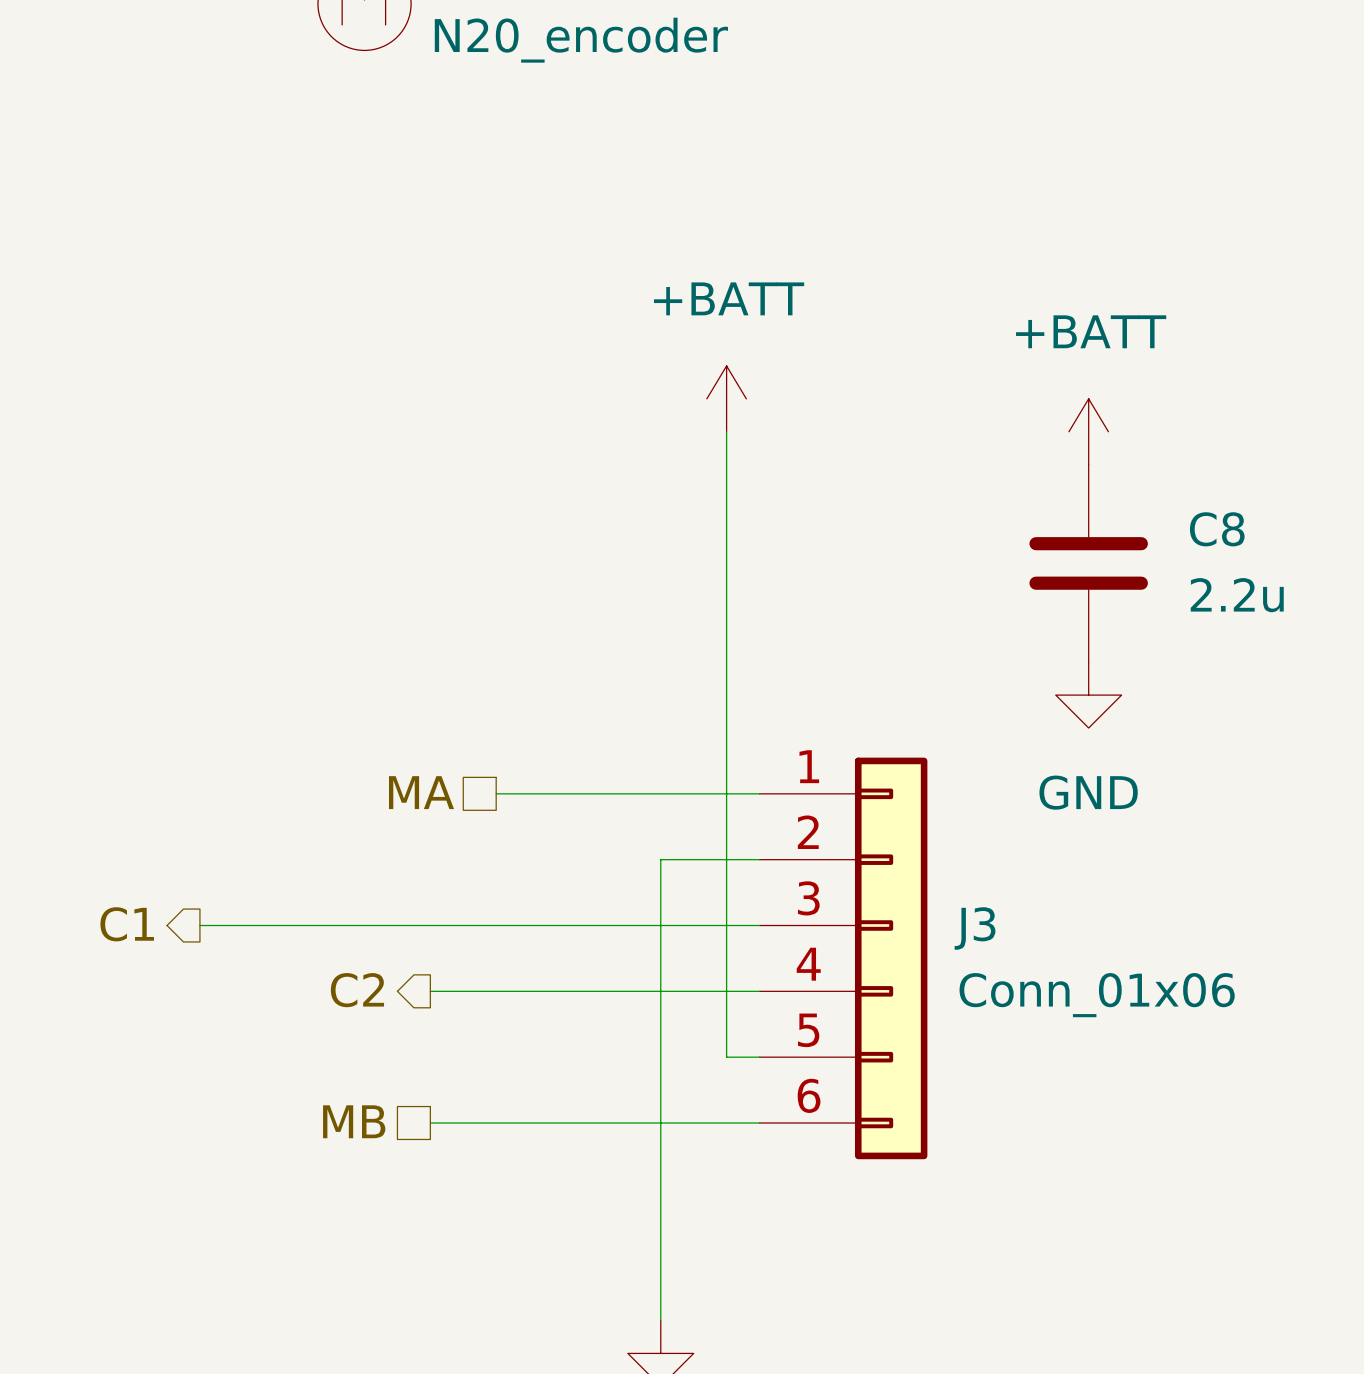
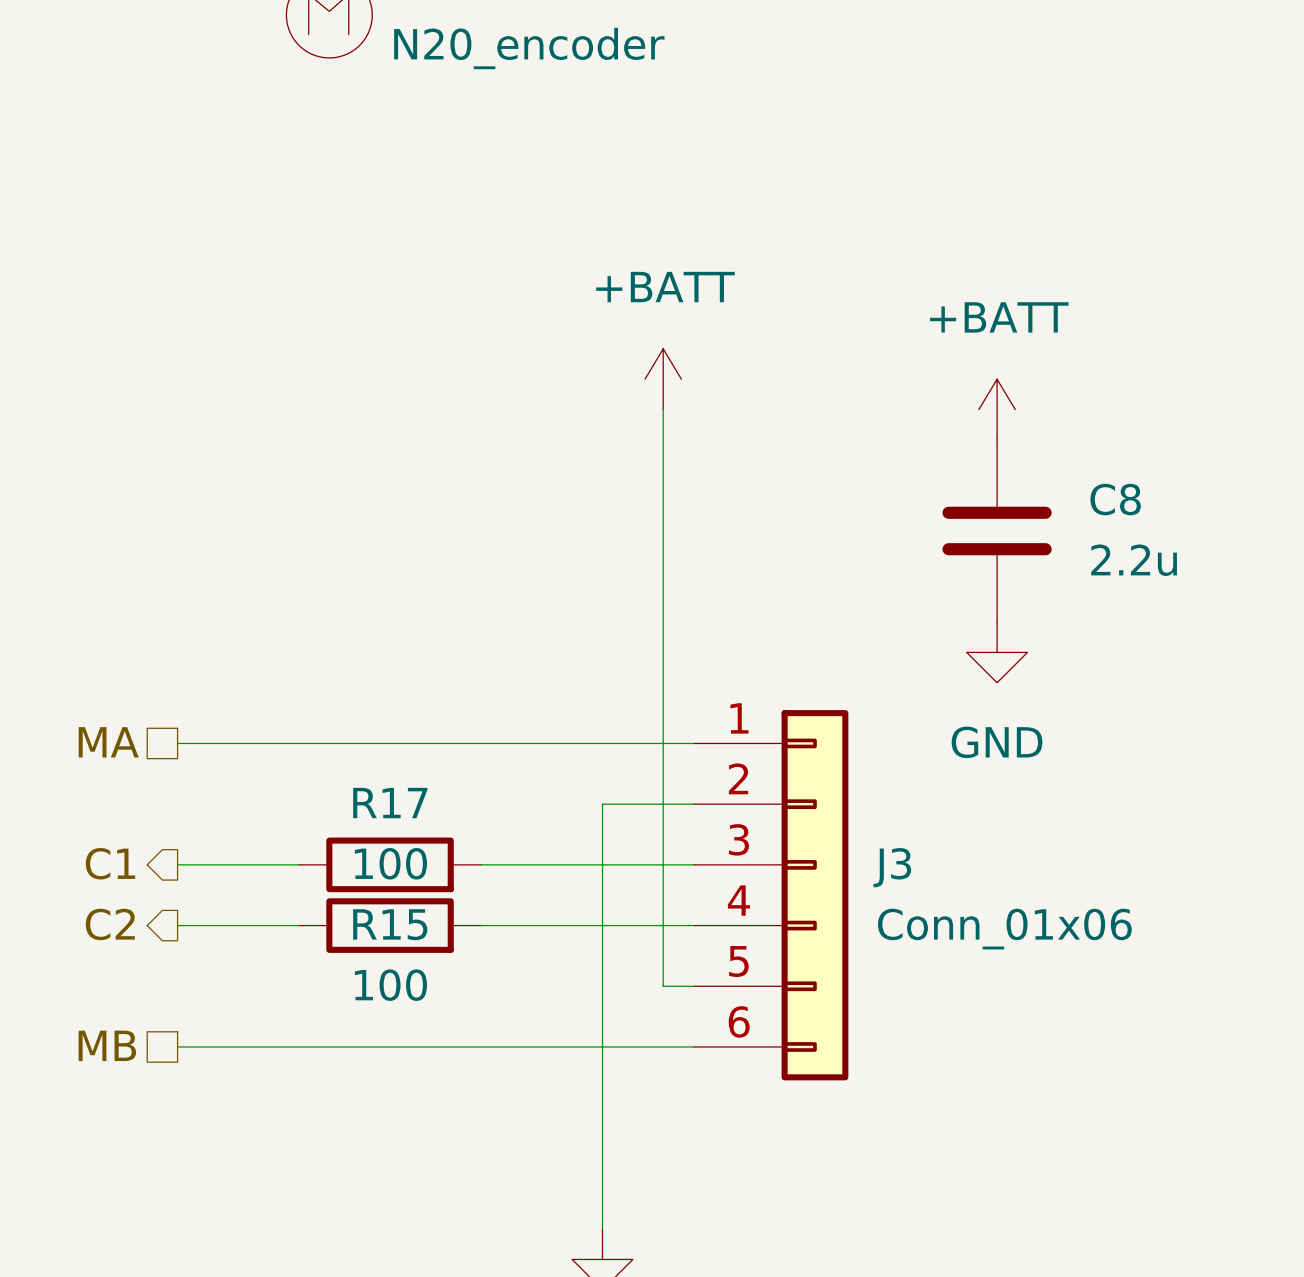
hierarchical label position: MA (421, 792) -> MA (108, 742)
wire: none -> (177, 743) (450, 743)
wire: (331, 925) (529, 925) -> none
R17: none -> 100 (390, 864)
hierarchical label position: C2 (357, 990) -> C2 (110, 924)
wire: none -> (177, 925) (298, 925)
wire: (430, 991) (529, 991) -> none
R15: none -> 100 (390, 925)
hierarchical label position: MB (354, 1121) -> MB (107, 1045)
wire: none -> (177, 1046) (390, 1046)

